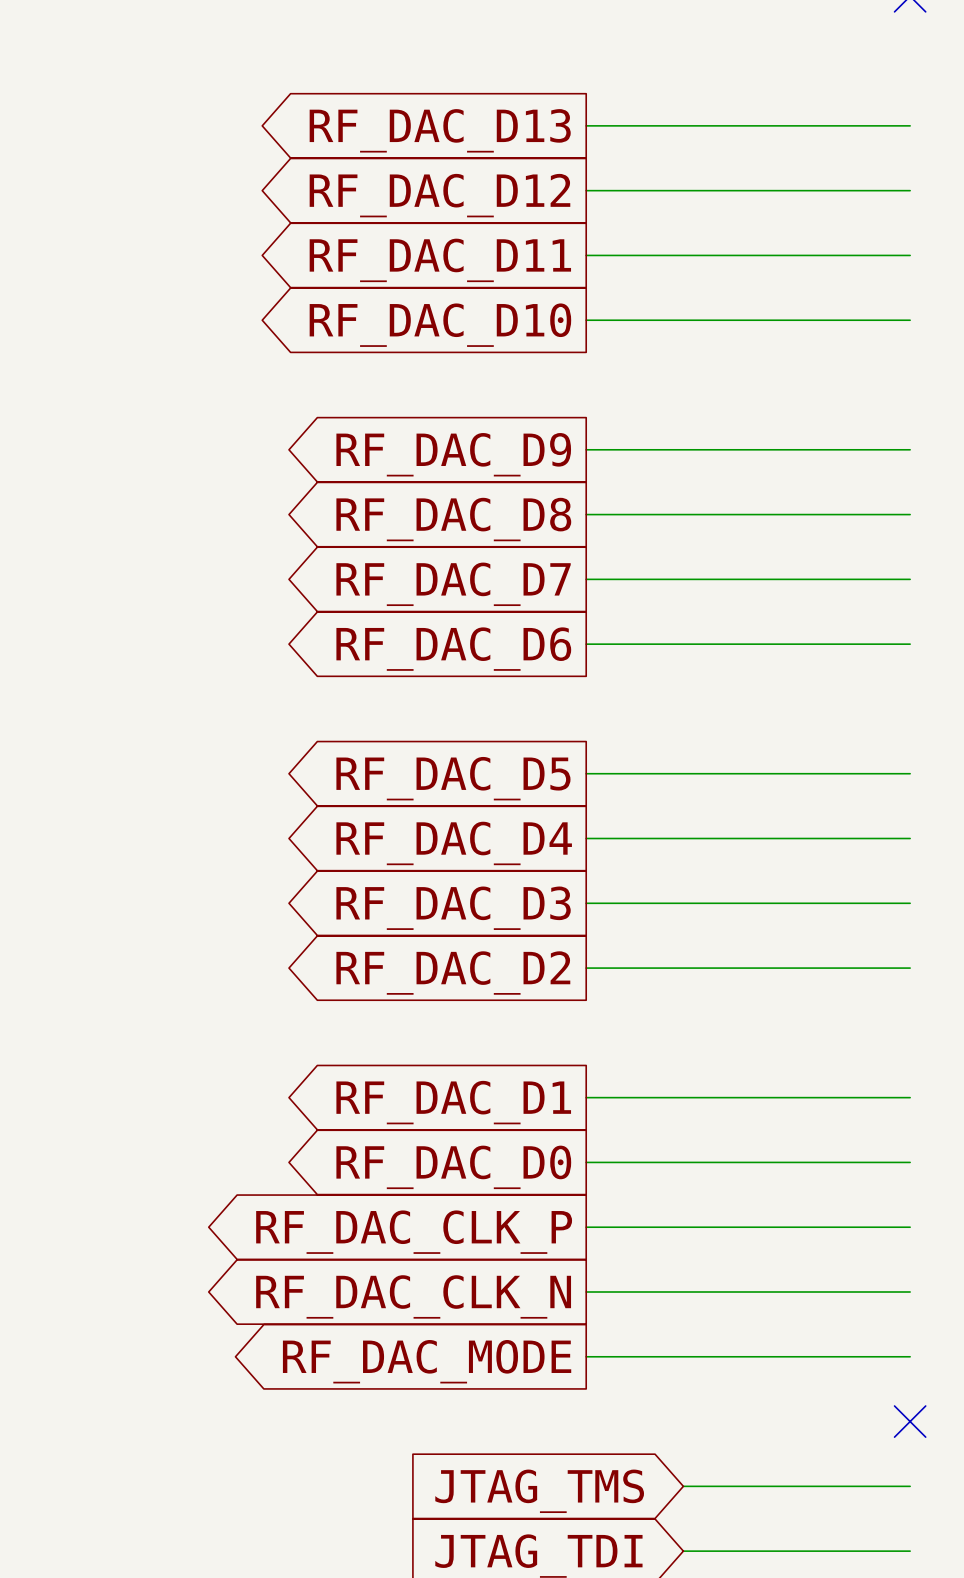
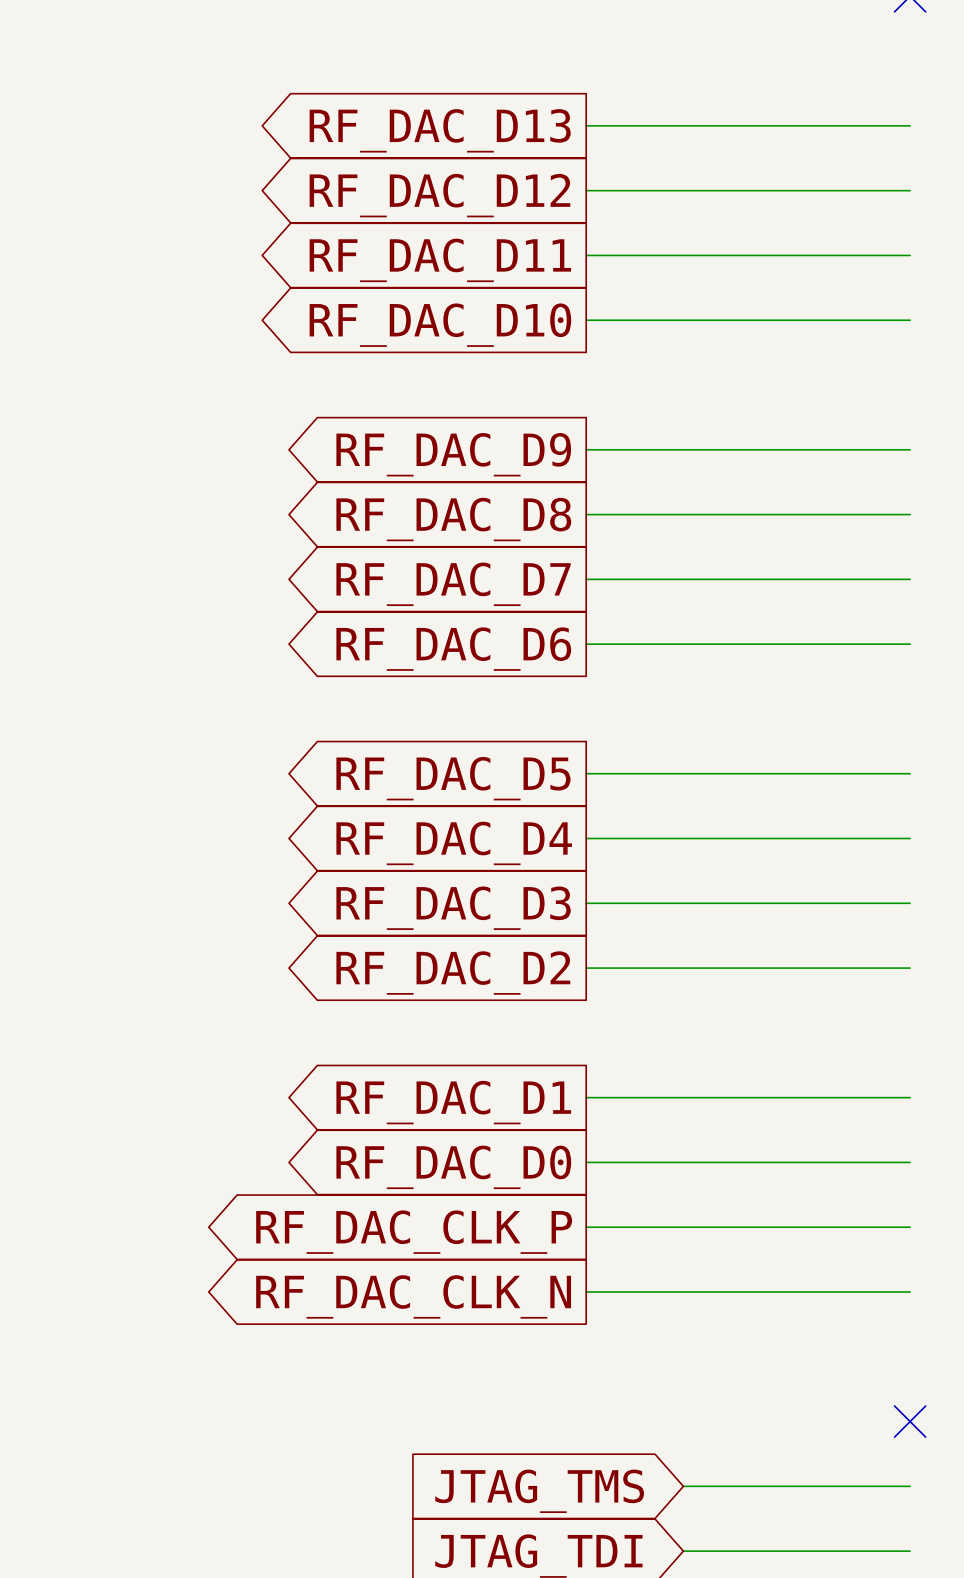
wire: (586, 1356) (910, 1356) -> none
global label: RF_DAC_MODE (427, 1361) -> none

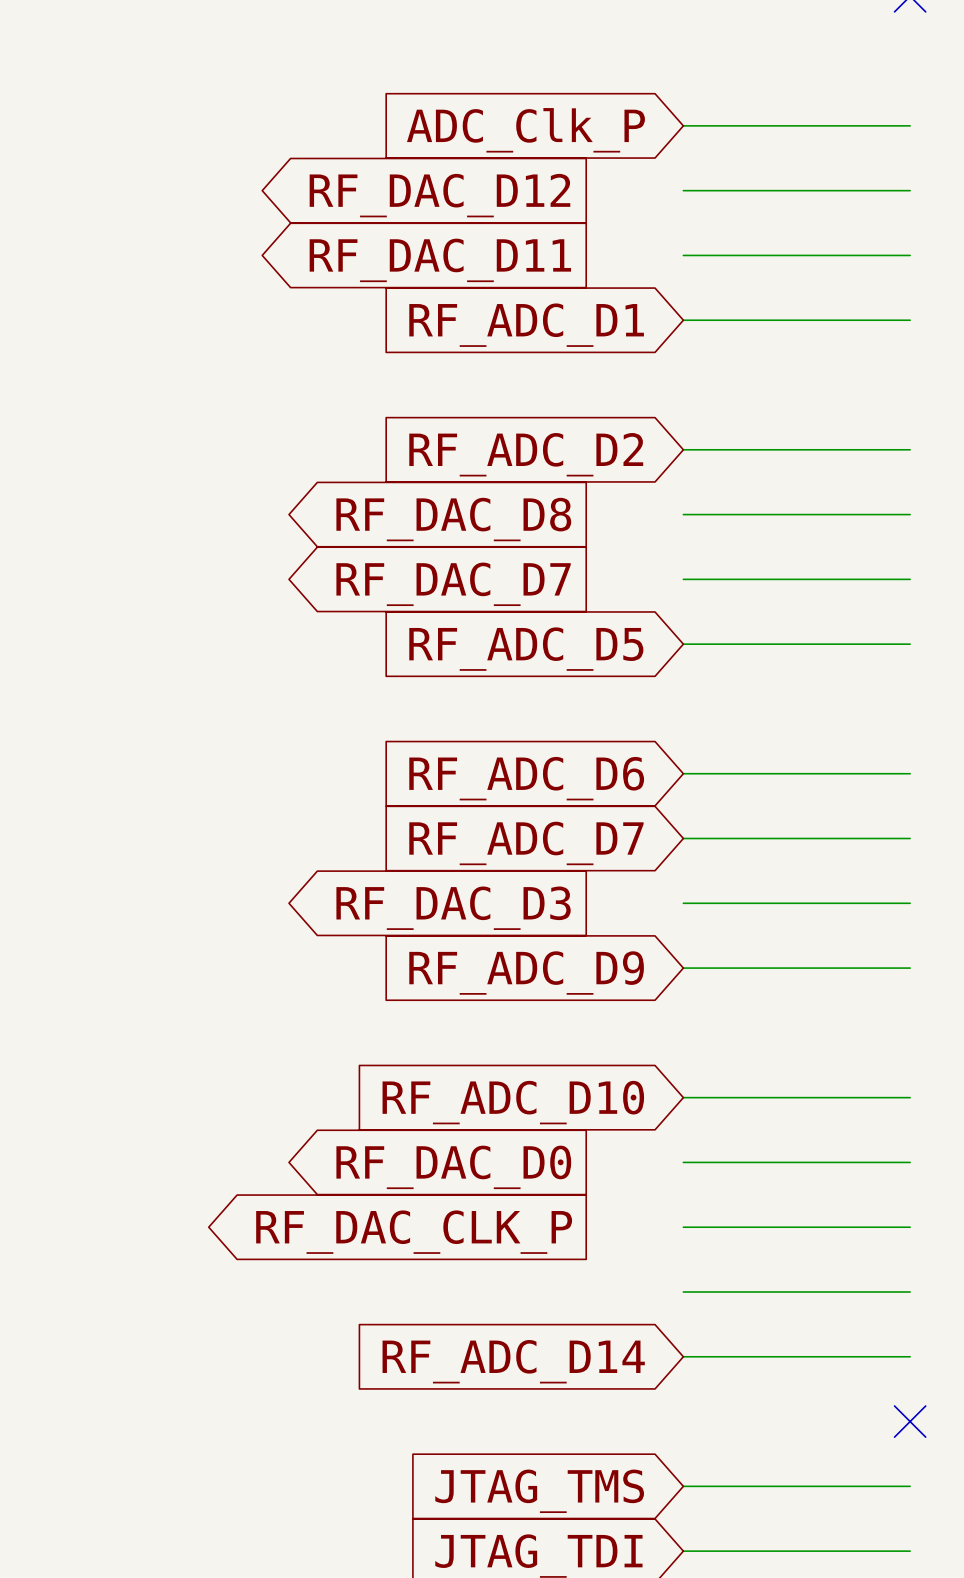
wire: (586, 125) (683, 125) -> none
global label: RF_DAC_D13 (440, 130) -> none
global label: none -> ADC_Clk_P (525, 130)
wire: (586, 190) (683, 190) -> none
wire: (586, 255) (683, 255) -> none
wire: (586, 320) (683, 320) -> none
global label shape: output (440, 325) -> input (526, 325)
global label: RF_DAC_D10 (440, 325) -> RF_ADC_D1 (526, 325)
wire: (586, 449) (683, 449) -> none
global label shape: output (453, 454) -> input (526, 454)
global label: RF_DAC_D9 (453, 454) -> RF_ADC_D2 (526, 454)
wire: (586, 514) (683, 514) -> none
wire: (586, 579) (683, 579) -> none
wire: (586, 644) (683, 644) -> none
global label shape: output (453, 649) -> input (526, 649)
global label: RF_DAC_D6 (453, 649) -> RF_ADC_D5 (526, 649)
wire: (586, 773) (683, 773) -> none
global label: RF_DAC_D5 (453, 778) -> none
global label: none -> RF_ADC_D6 (526, 778)
wire: (586, 838) (683, 838) -> none
global label: RF_DAC_D4 (454, 843) -> none
global label: none -> RF_ADC_D7 (526, 843)
wire: (586, 903) (683, 903) -> none
wire: (586, 968) (683, 968) -> none
global label shape: output (453, 973) -> input (526, 973)
global label: RF_DAC_D2 (453, 973) -> RF_ADC_D9 (526, 973)
wire: (586, 1097) (683, 1097) -> none
global label shape: output (453, 1102) -> input (513, 1102)
global label: RF_DAC_D1 (453, 1102) -> RF_ADC_D10 (513, 1102)
wire: (586, 1162) (683, 1162) -> none
wire: (586, 1227) (683, 1227) -> none
wire: (586, 1291) (683, 1291) -> none
global label: RF_DAC_CLK_N (413, 1296) -> none
wire: none -> (683, 1356) (910, 1356)
global label: none -> RF_ADC_D14 (513, 1361)

